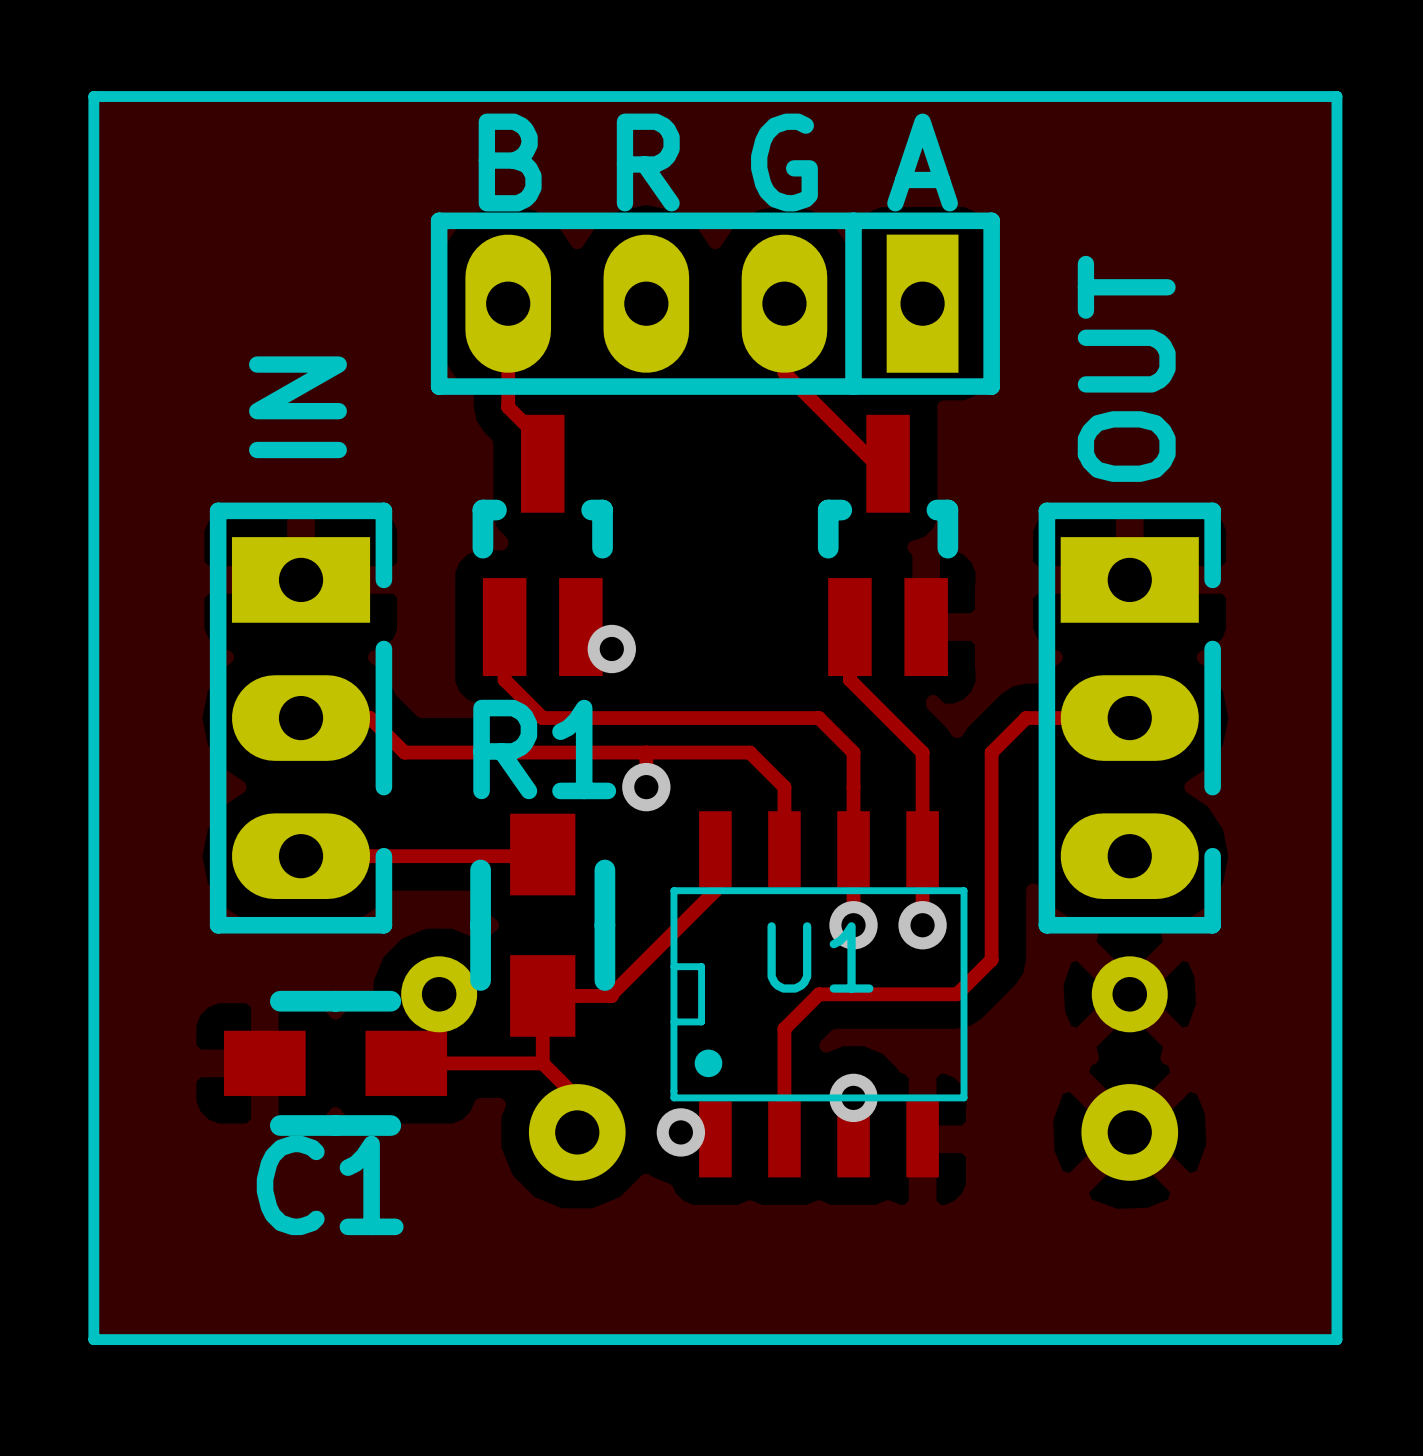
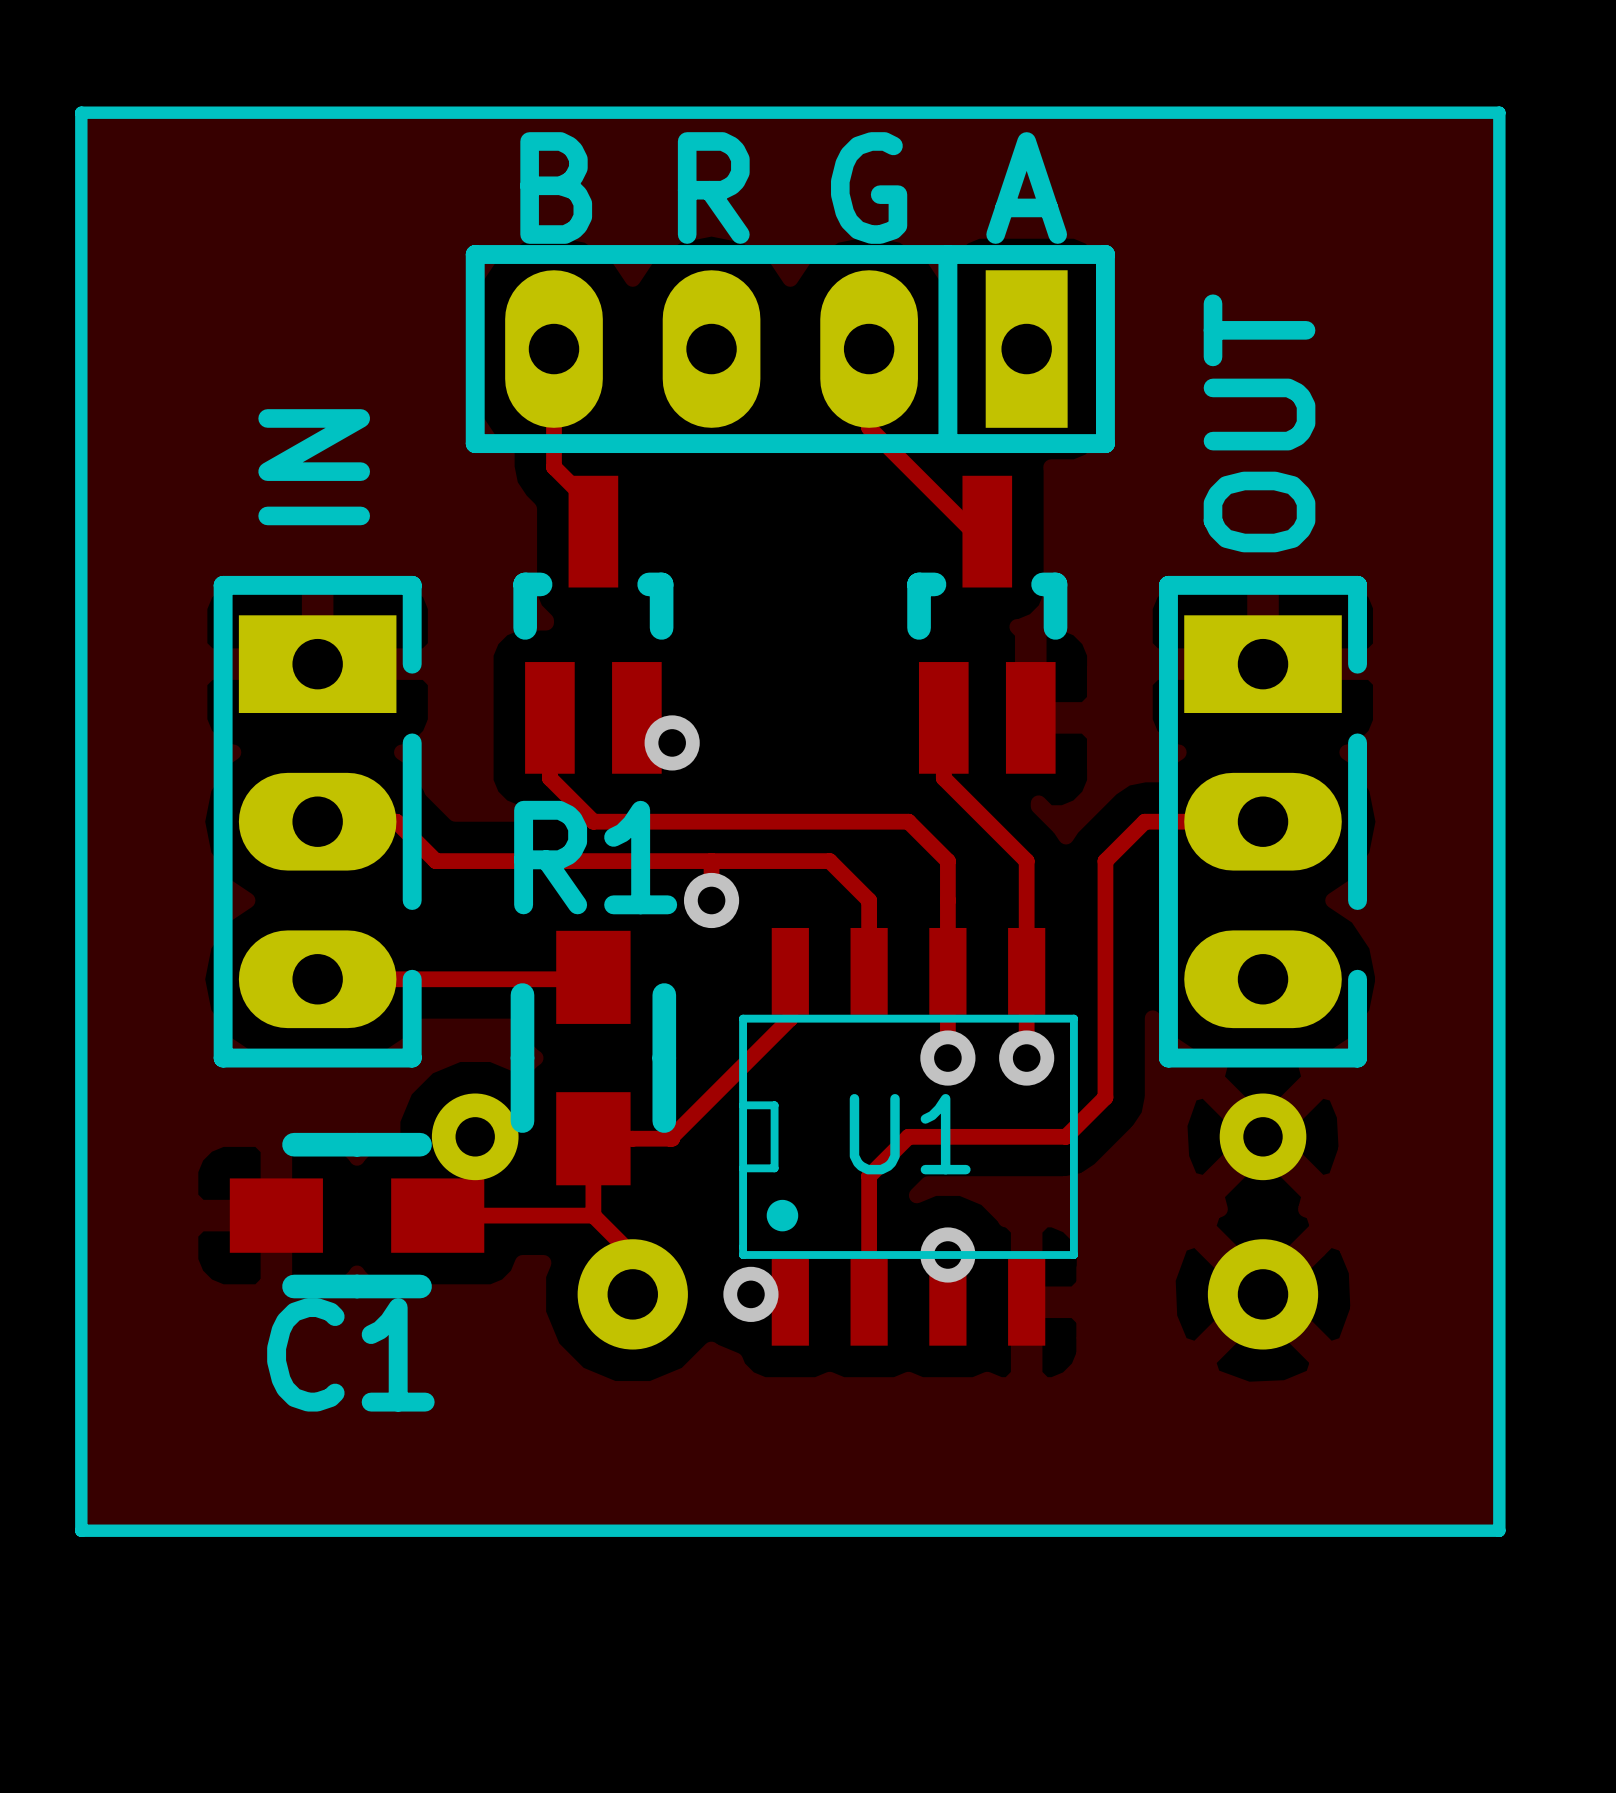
U1 name position: U1 (820, 957) -> U1 (910, 1134)

